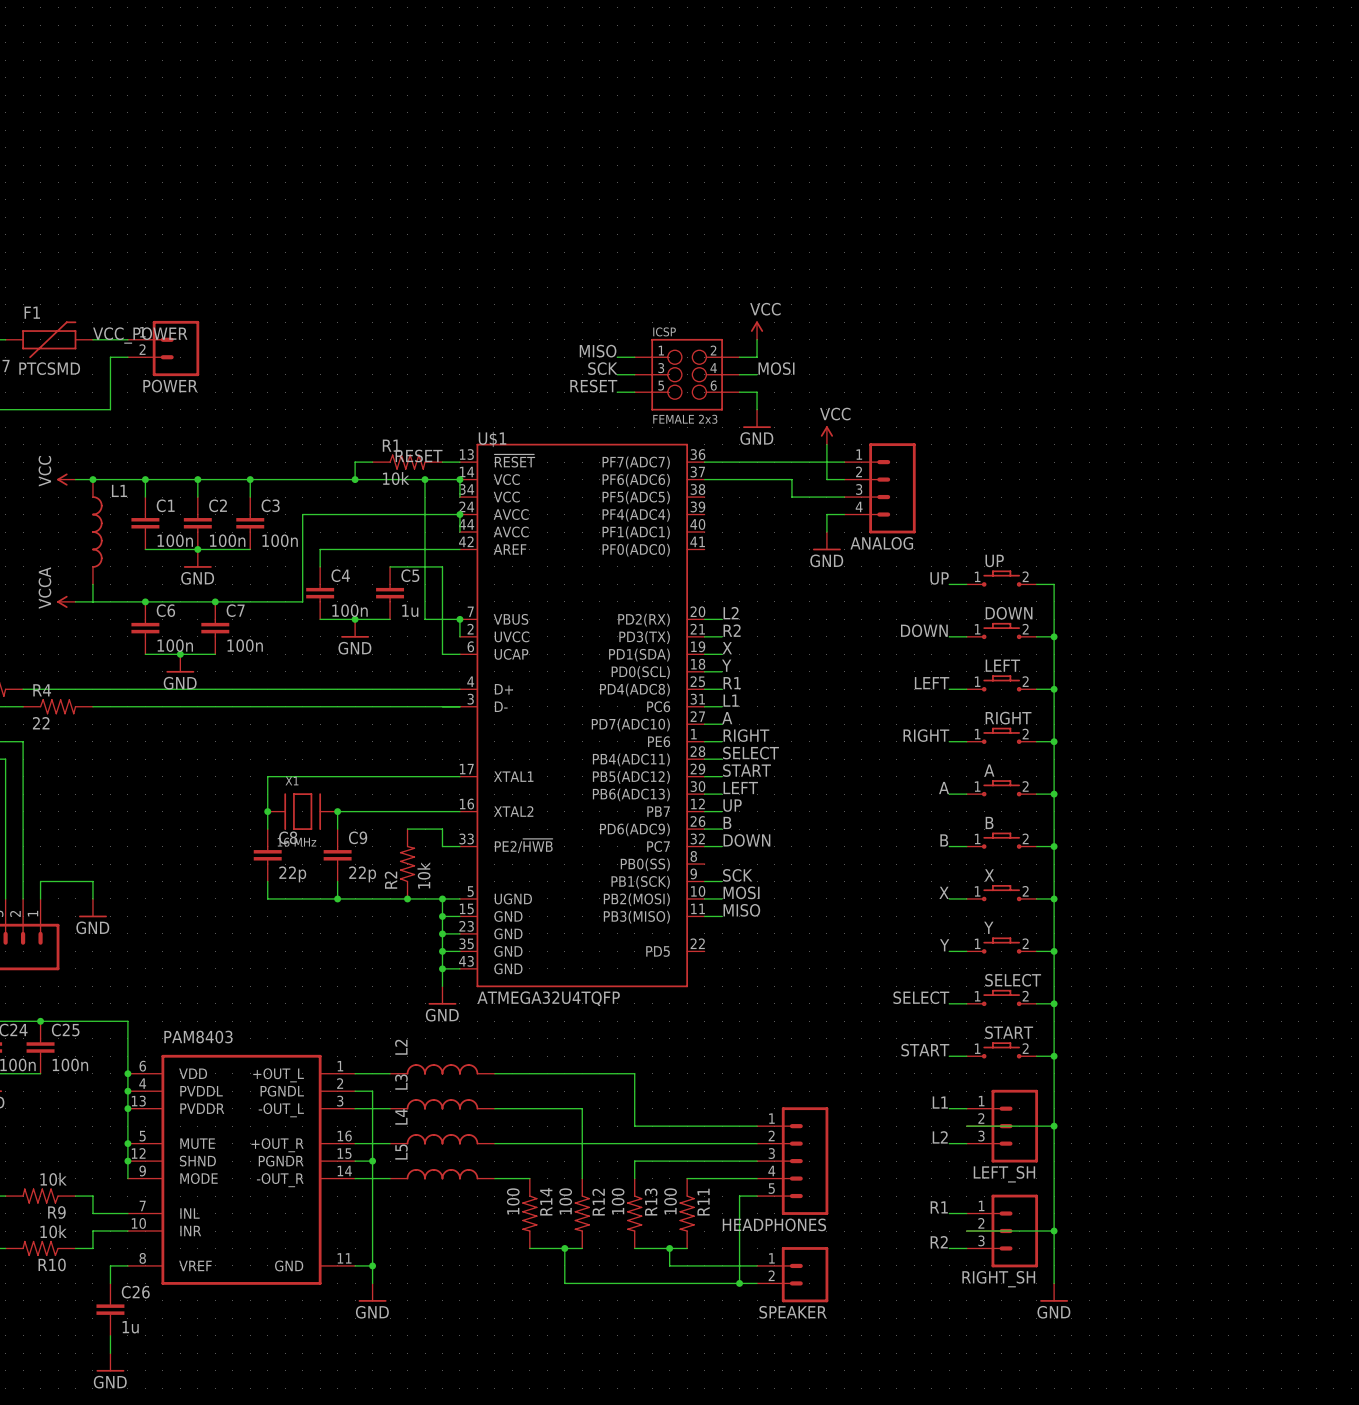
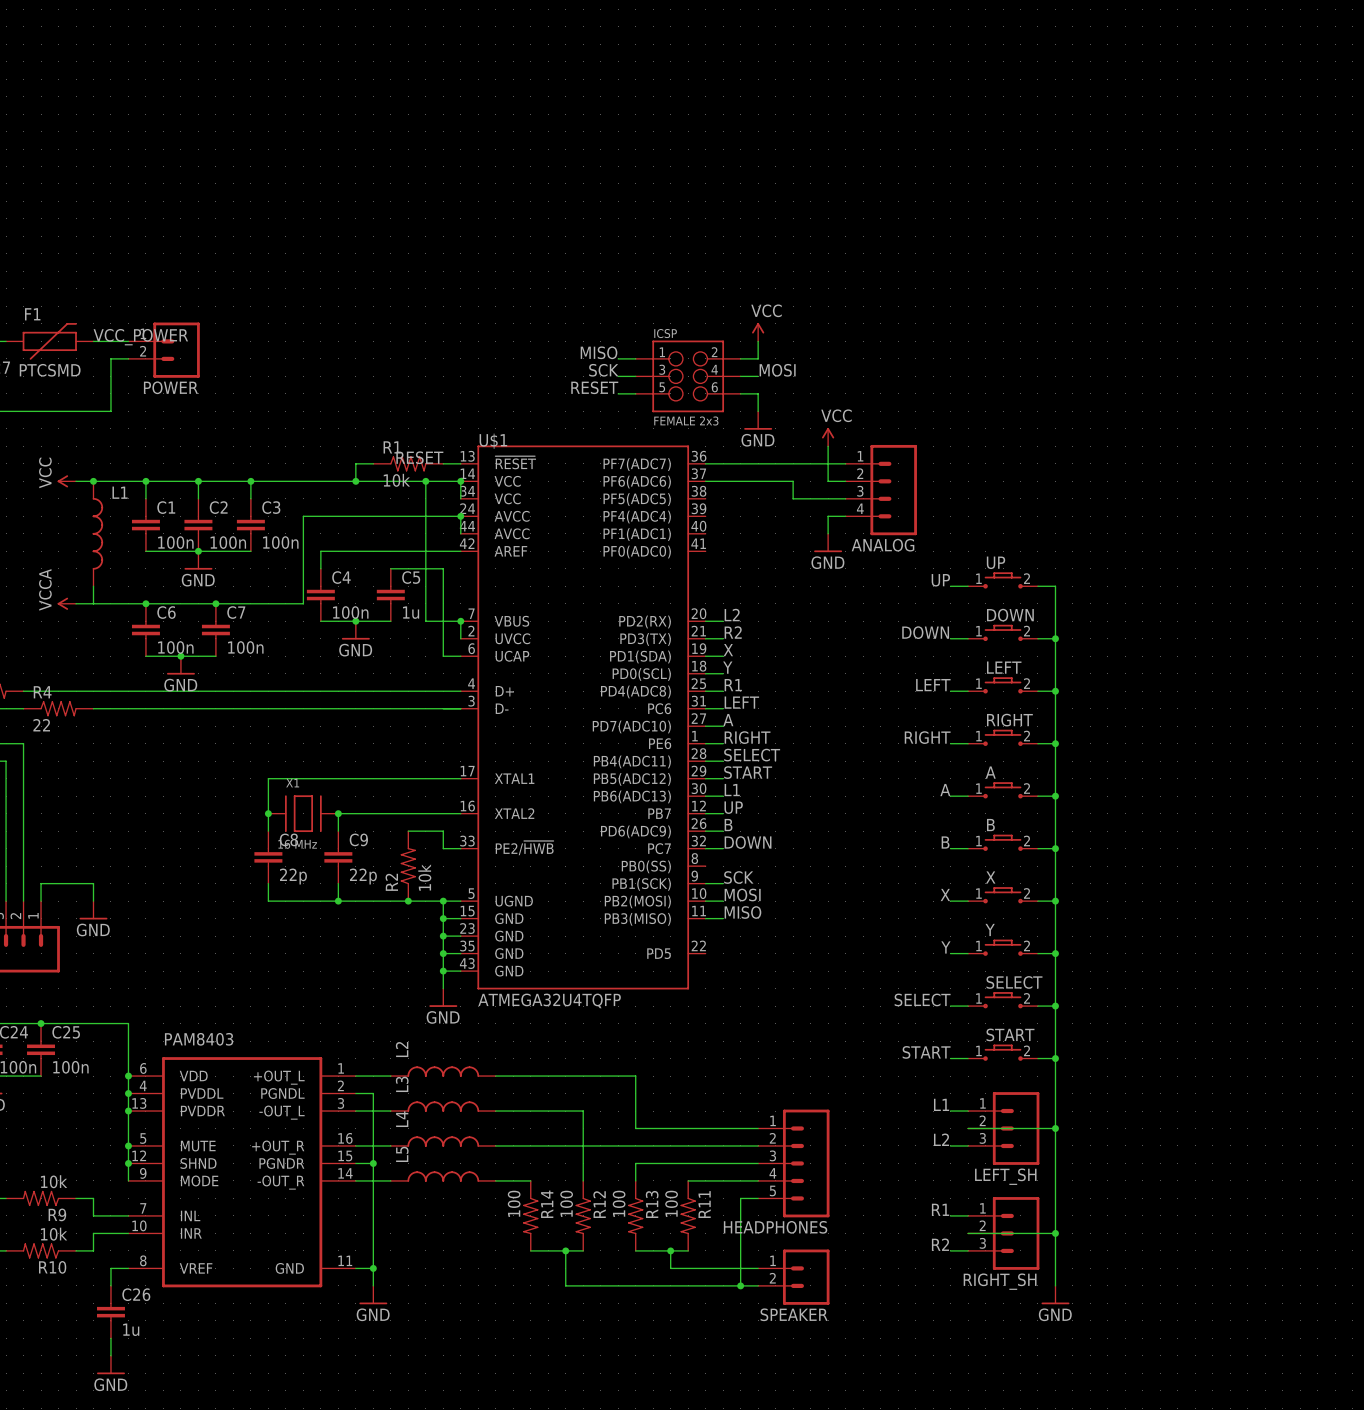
label: L1 (731, 700) -> LEFT (741, 702)
label: LEFT (740, 788) -> L1 (732, 790)

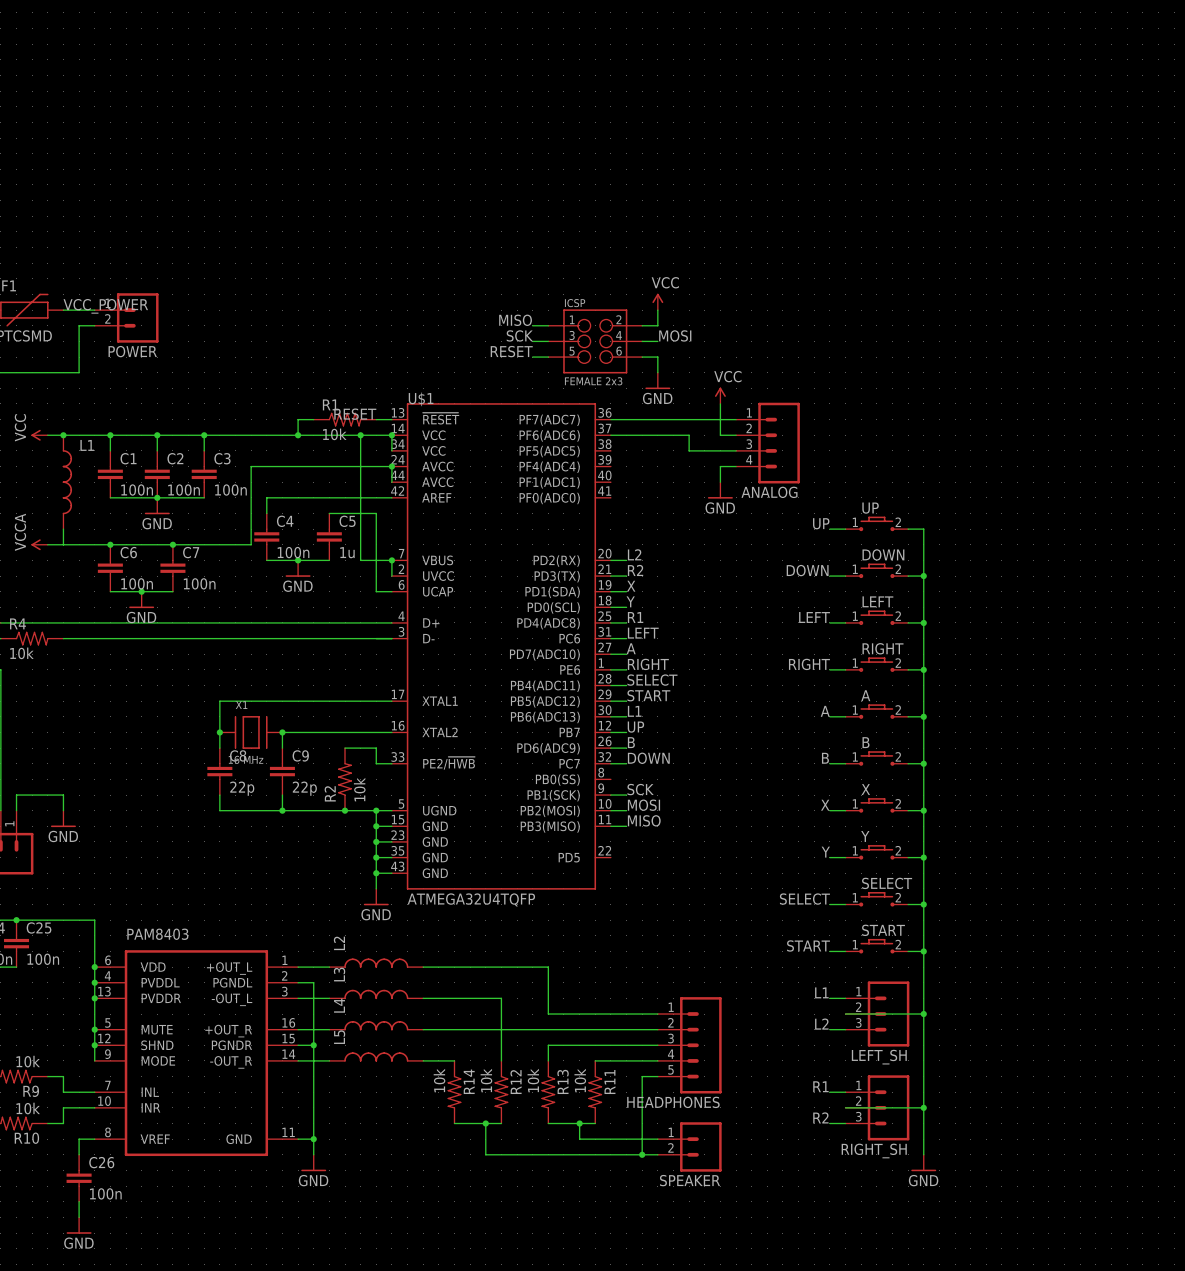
R4 value: 22 (41, 725) -> 10k (21, 653)
R14 value: 100 (514, 1203) -> 10k (439, 1080)
R12 value: 100 (566, 1203) -> 10k (486, 1080)
R13 value: 100 (619, 1203) -> 10k (533, 1080)
R11 value: 100 (671, 1203) -> 10k (580, 1080)
C26 value: 1u (131, 1329) -> 100n (105, 1193)

